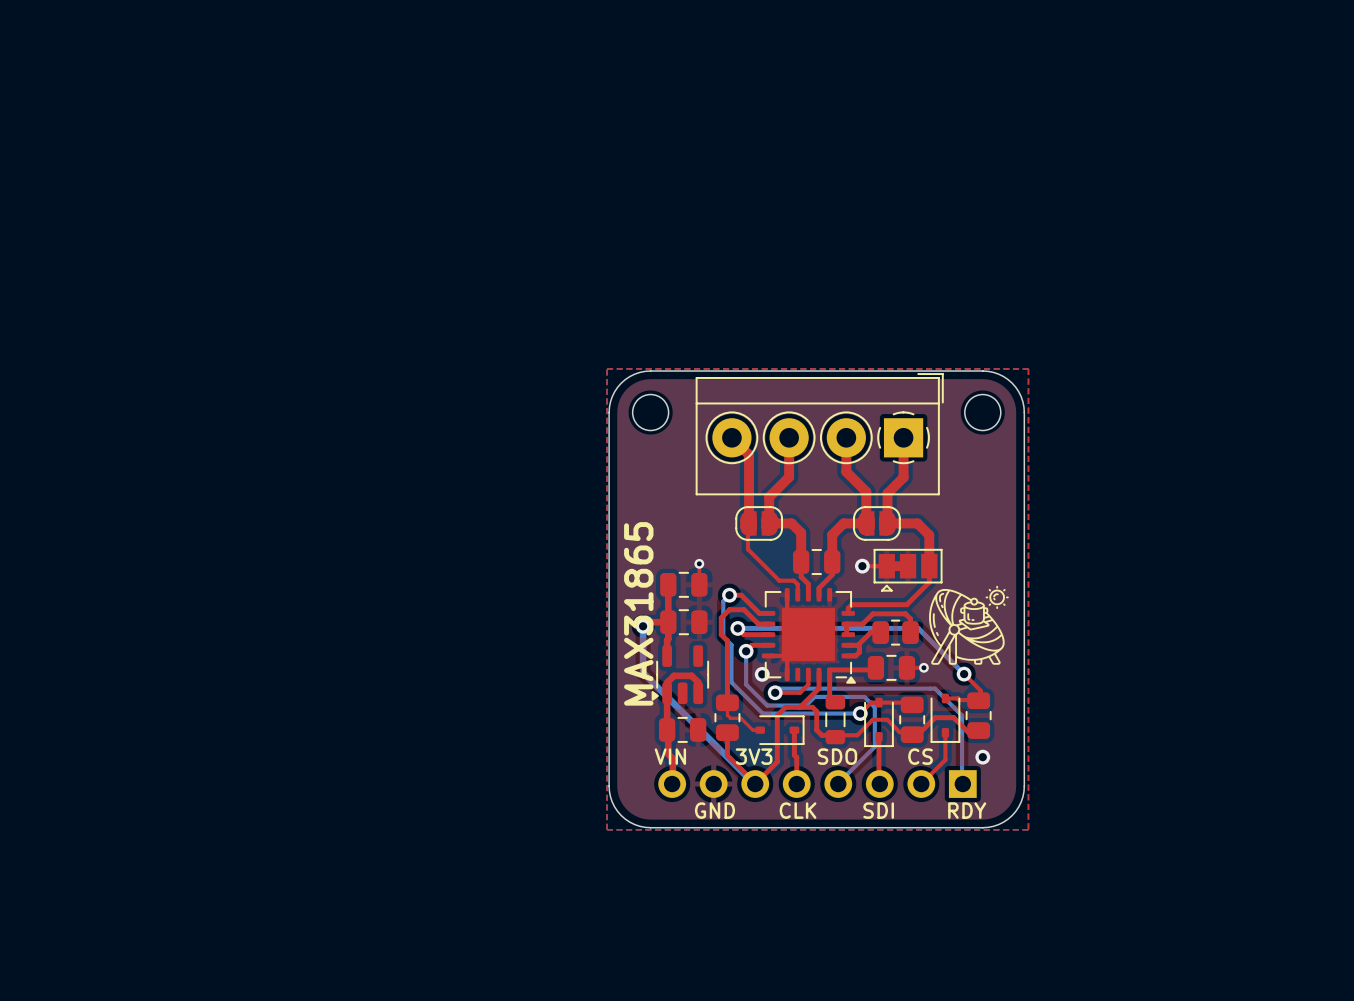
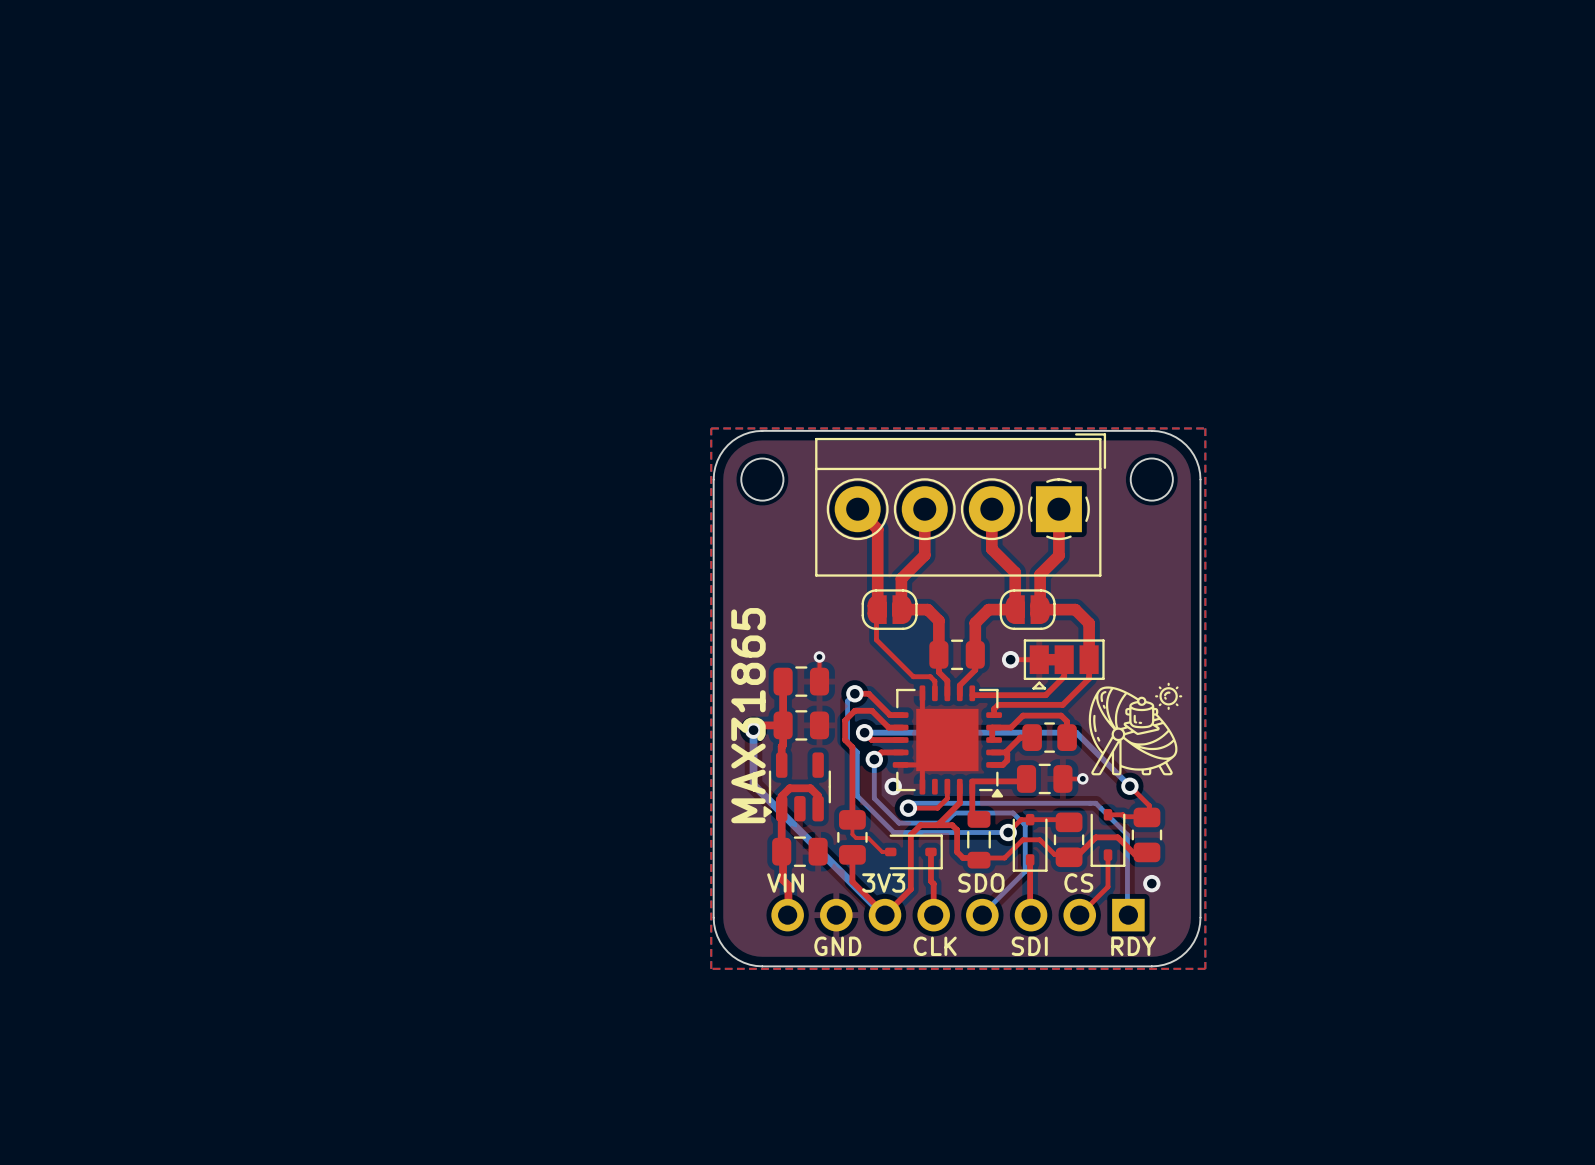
top track: none -> (1064, 659) (1064, 676) (1045, 695) (972, 695)

